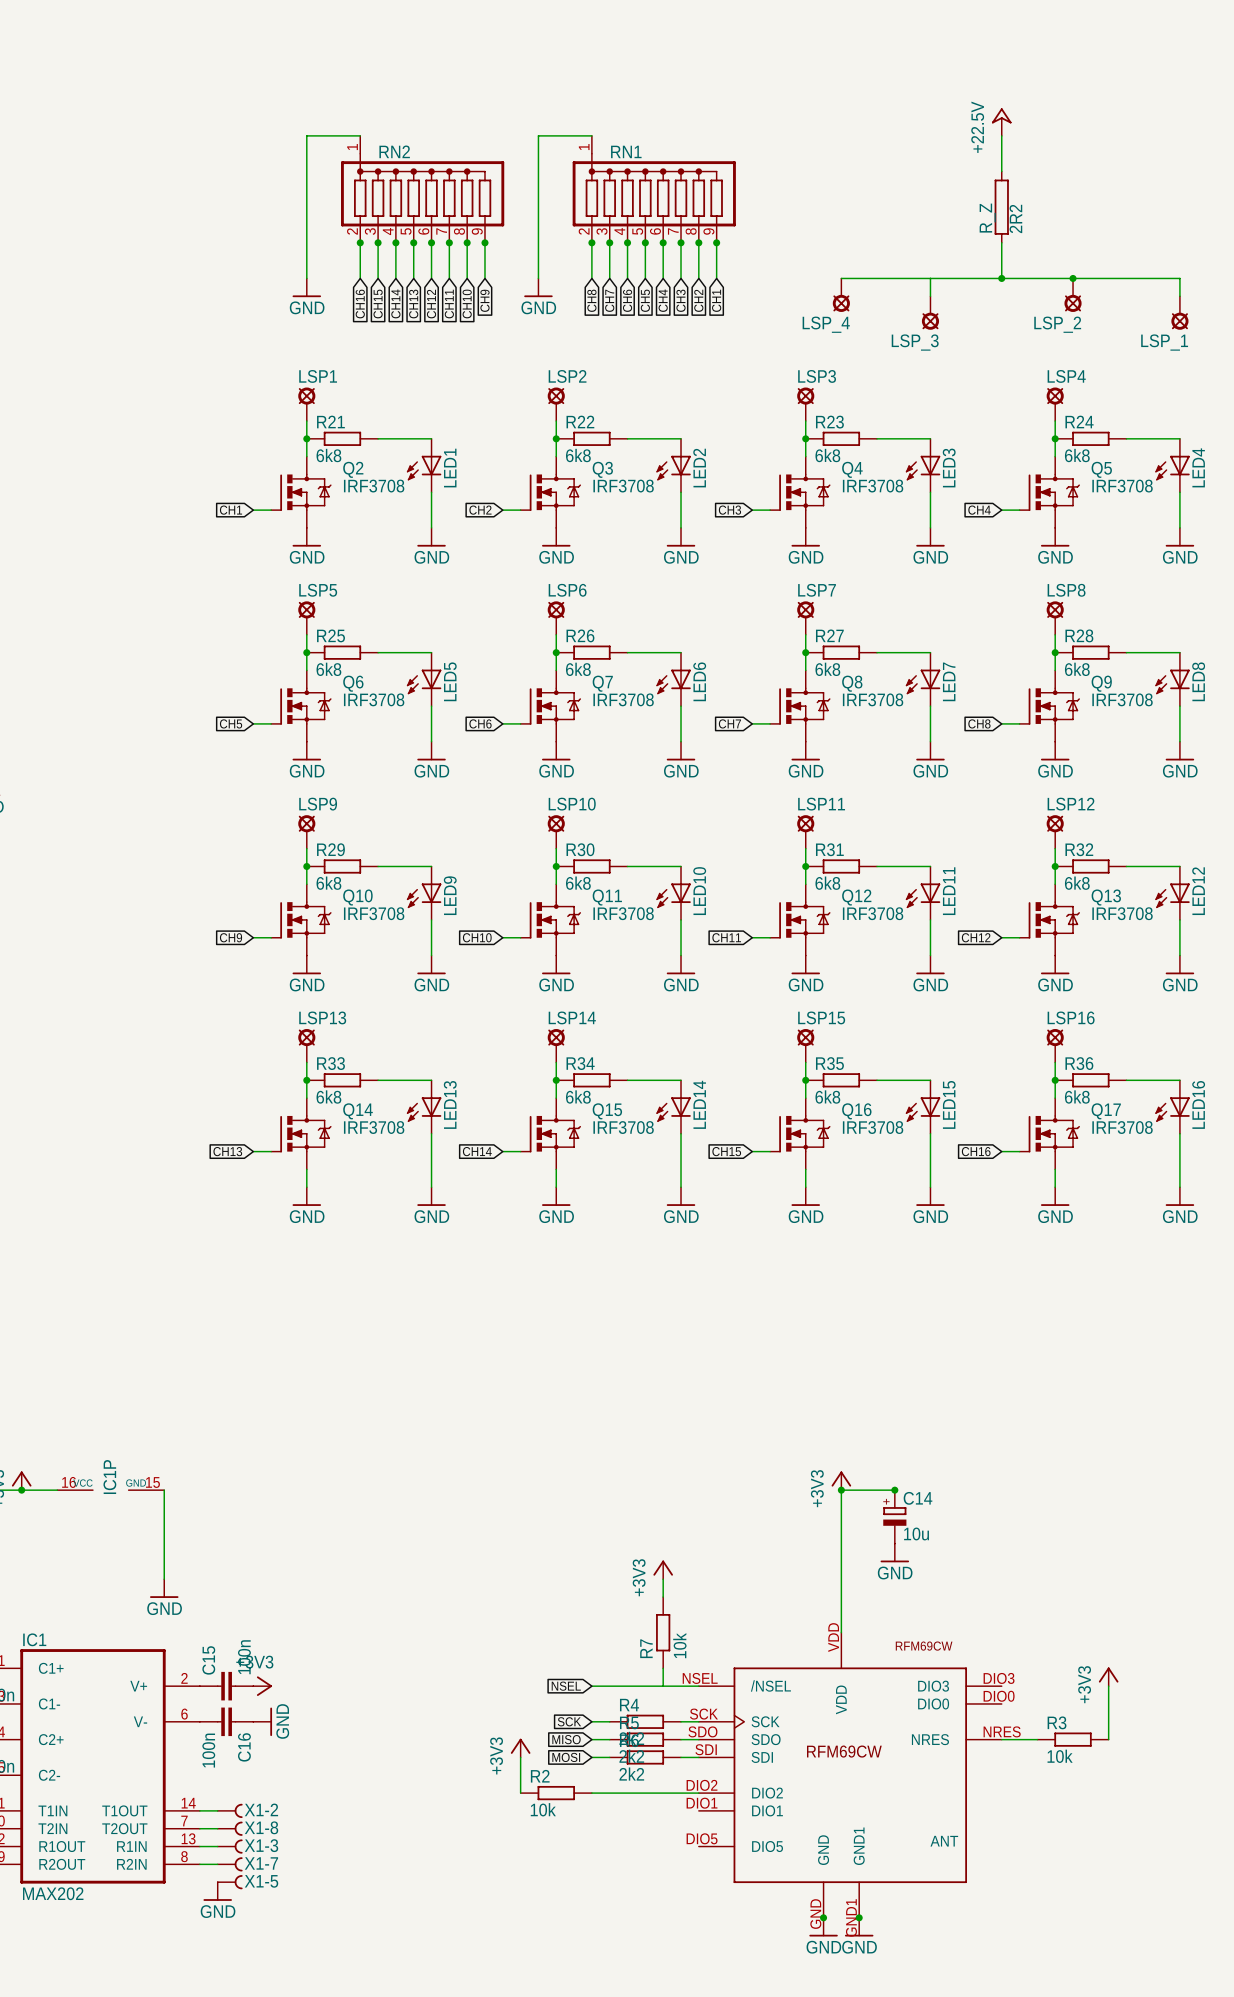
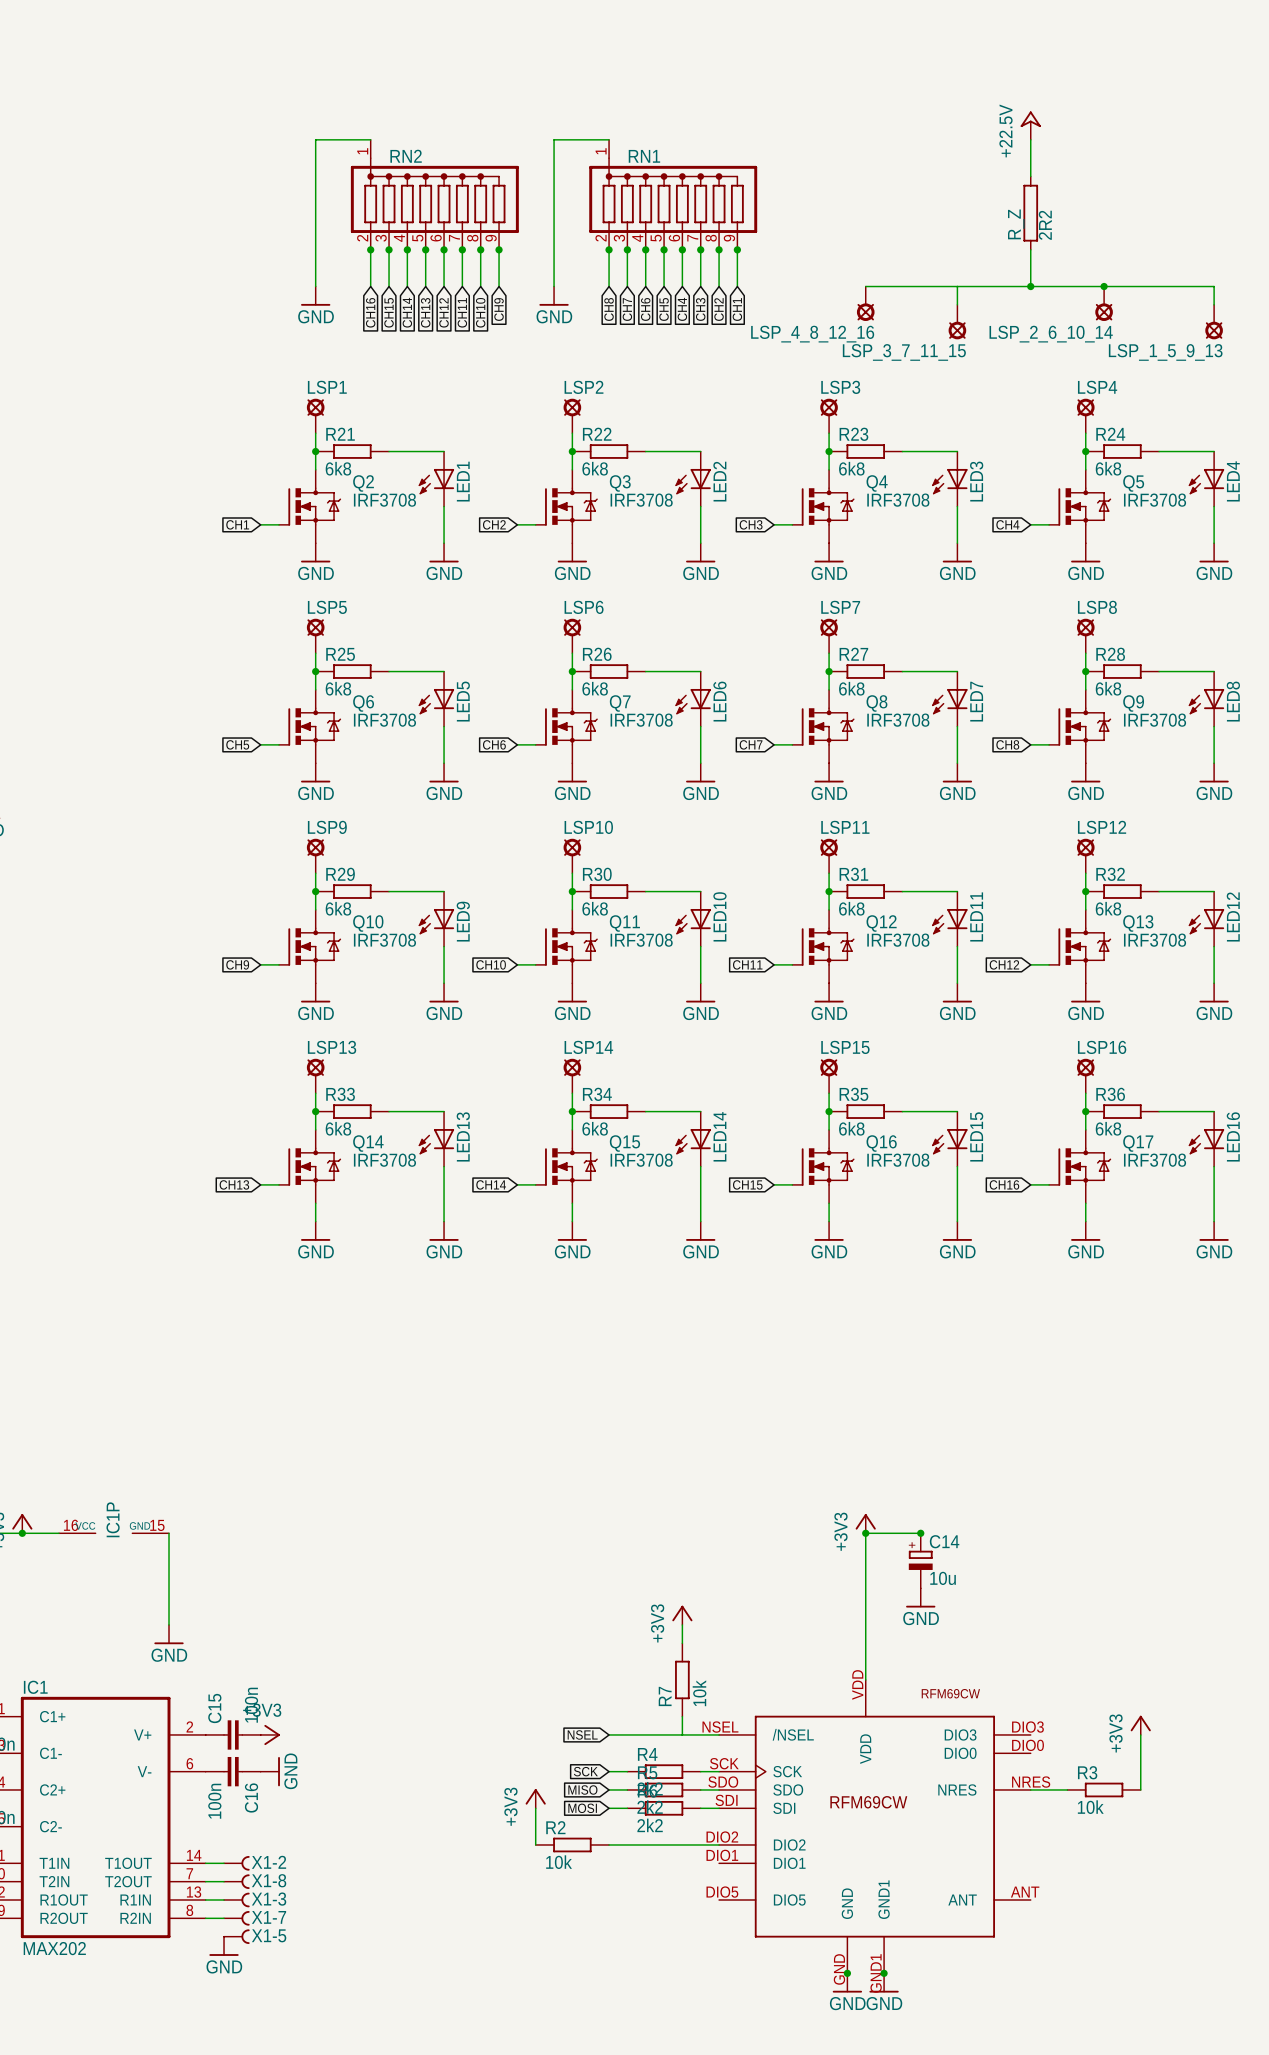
LSP_4 name: LSP_4 (826, 324) -> LSP_4_8_12_16 (812, 334)
LSP_2 name: LSP_2 (1057, 324) -> LSP_2_6_10_14 (1051, 334)
LSP_3 name: LSP_3 (915, 342) -> LSP_3_7_11_15 (904, 352)
LSP_1 name: LSP_1 (1164, 342) -> LSP_1_5_9_13 (1165, 352)
part symbol: [698, 1632, 1002, 1918] -> [719, 1679, 1031, 1974]

